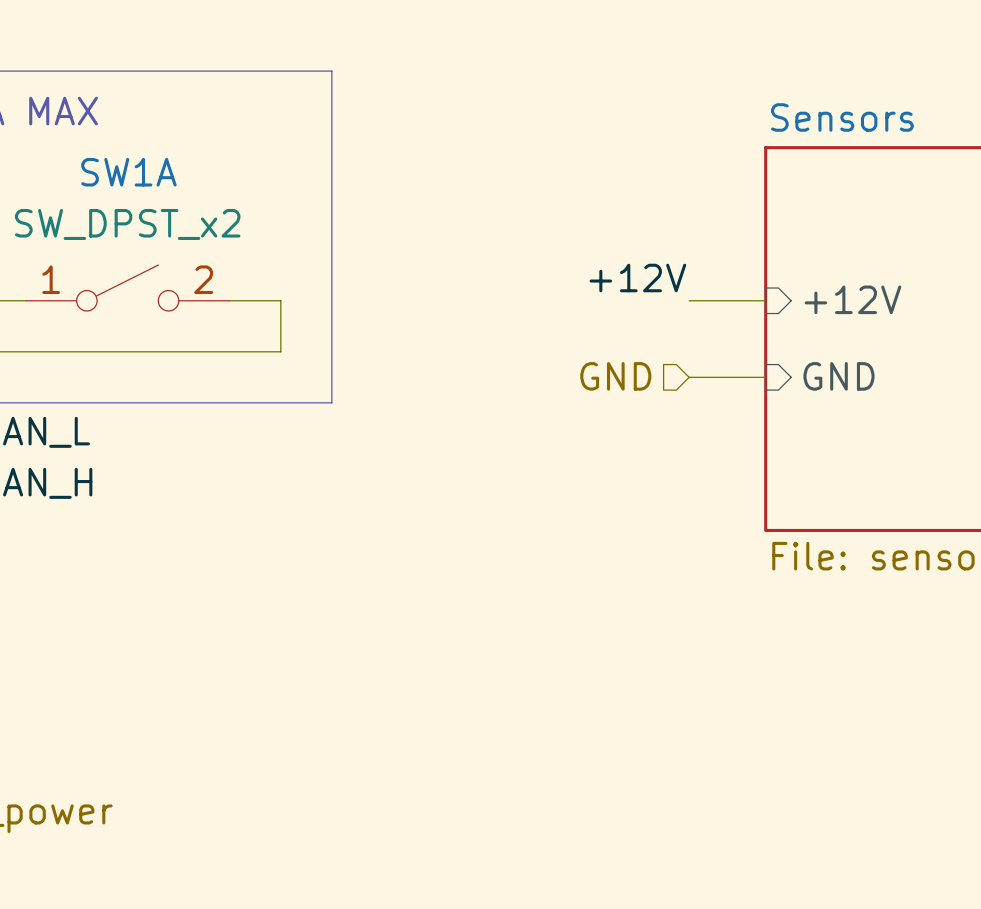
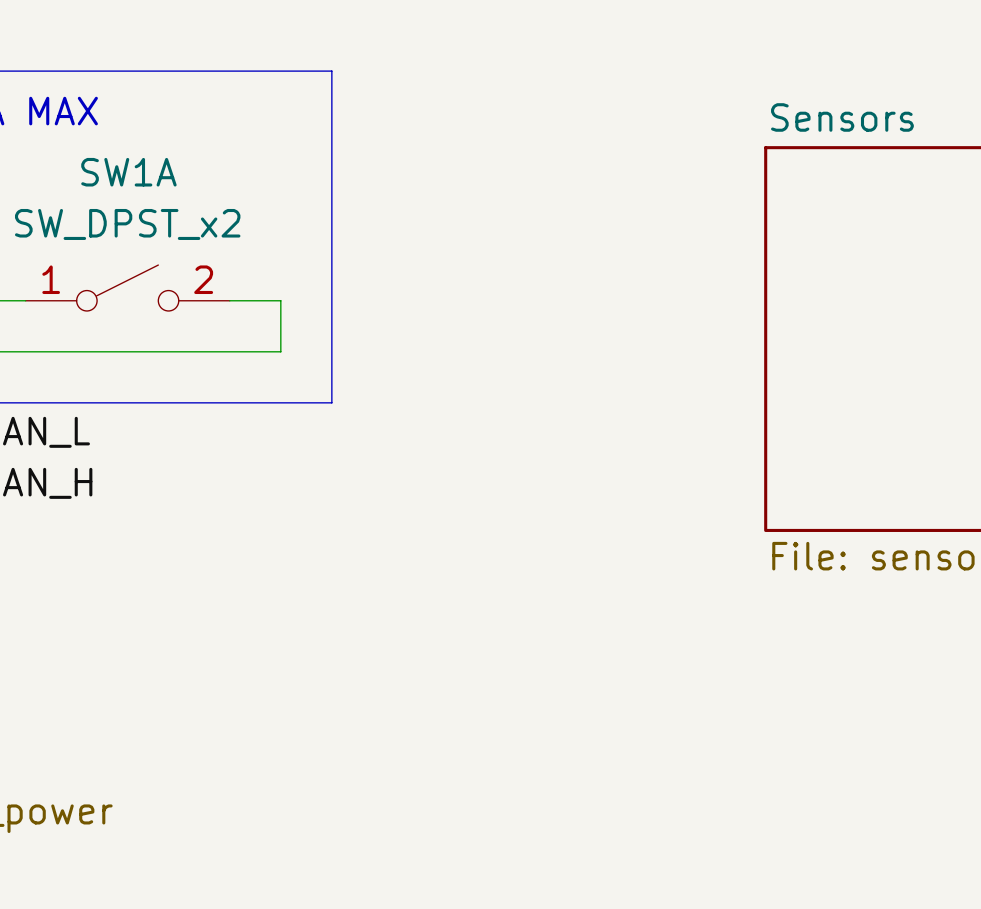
label: +12V (637, 278) -> none
sheet pin: +12V (852, 299) -> none
wire: (689, 300) (765, 300) -> none
hierarchical label: GND (615, 376) -> none
sheet pin: GND (839, 376) -> none
wire: (689, 377) (765, 377) -> none

